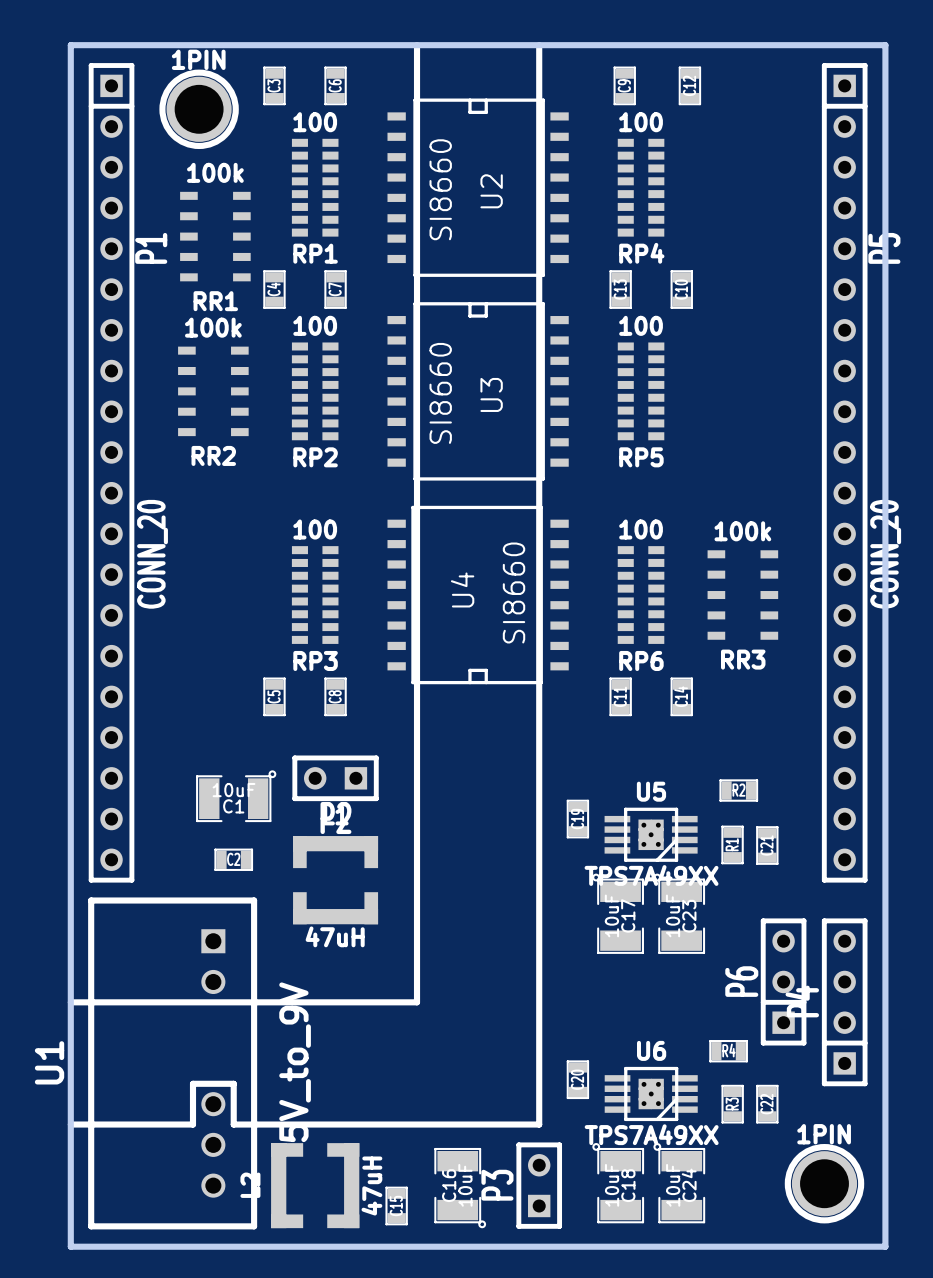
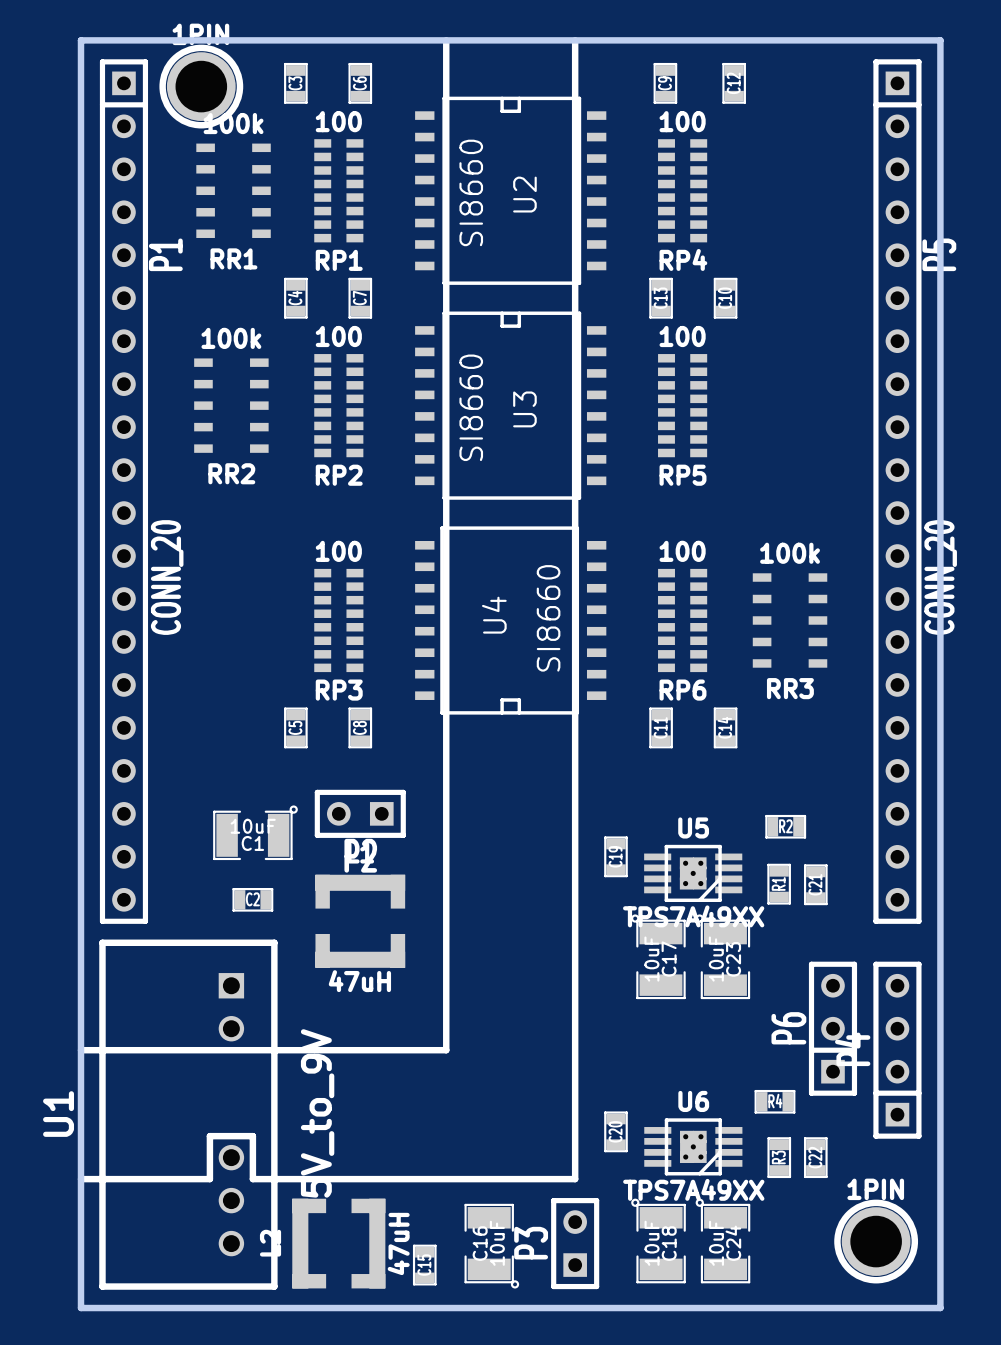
1PIN position: (199, 109) -> (201, 86)
RR1 position: (215, 236) -> (233, 190)

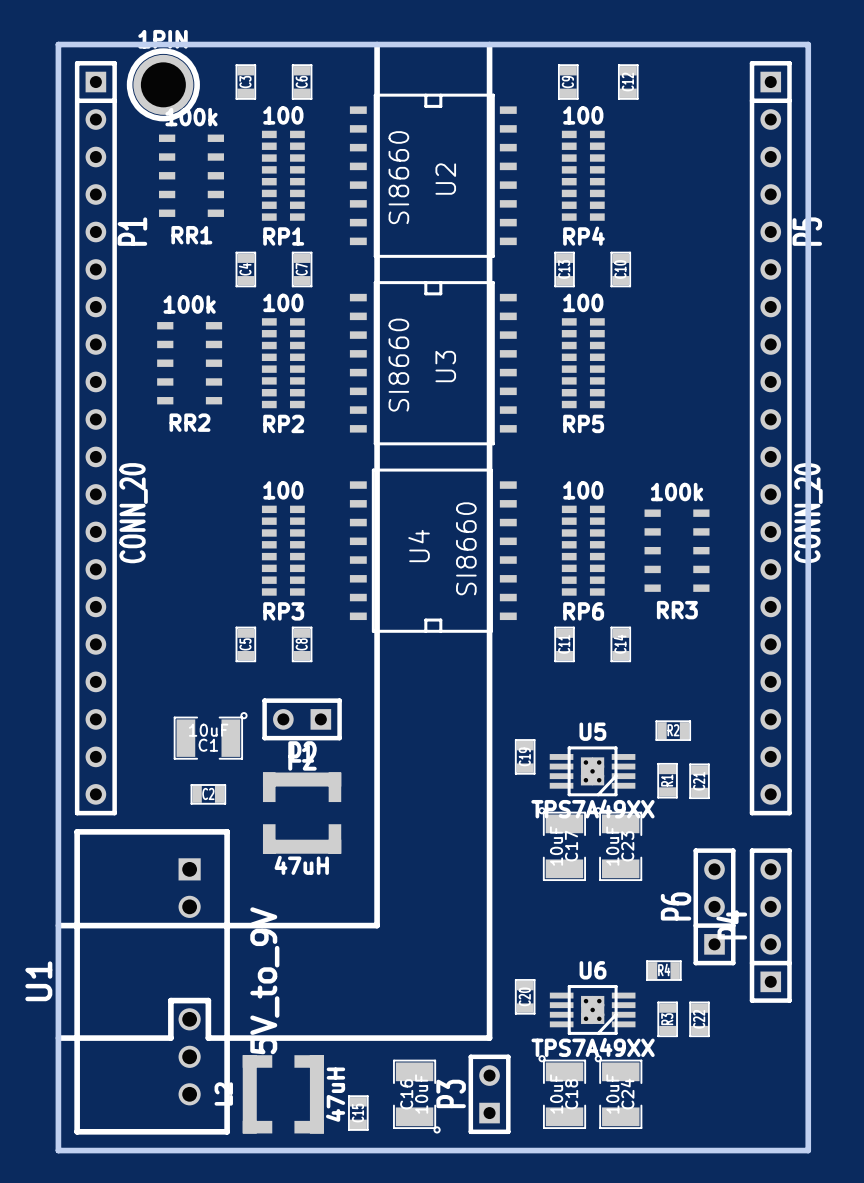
1PIN: (876, 1241) -> none

